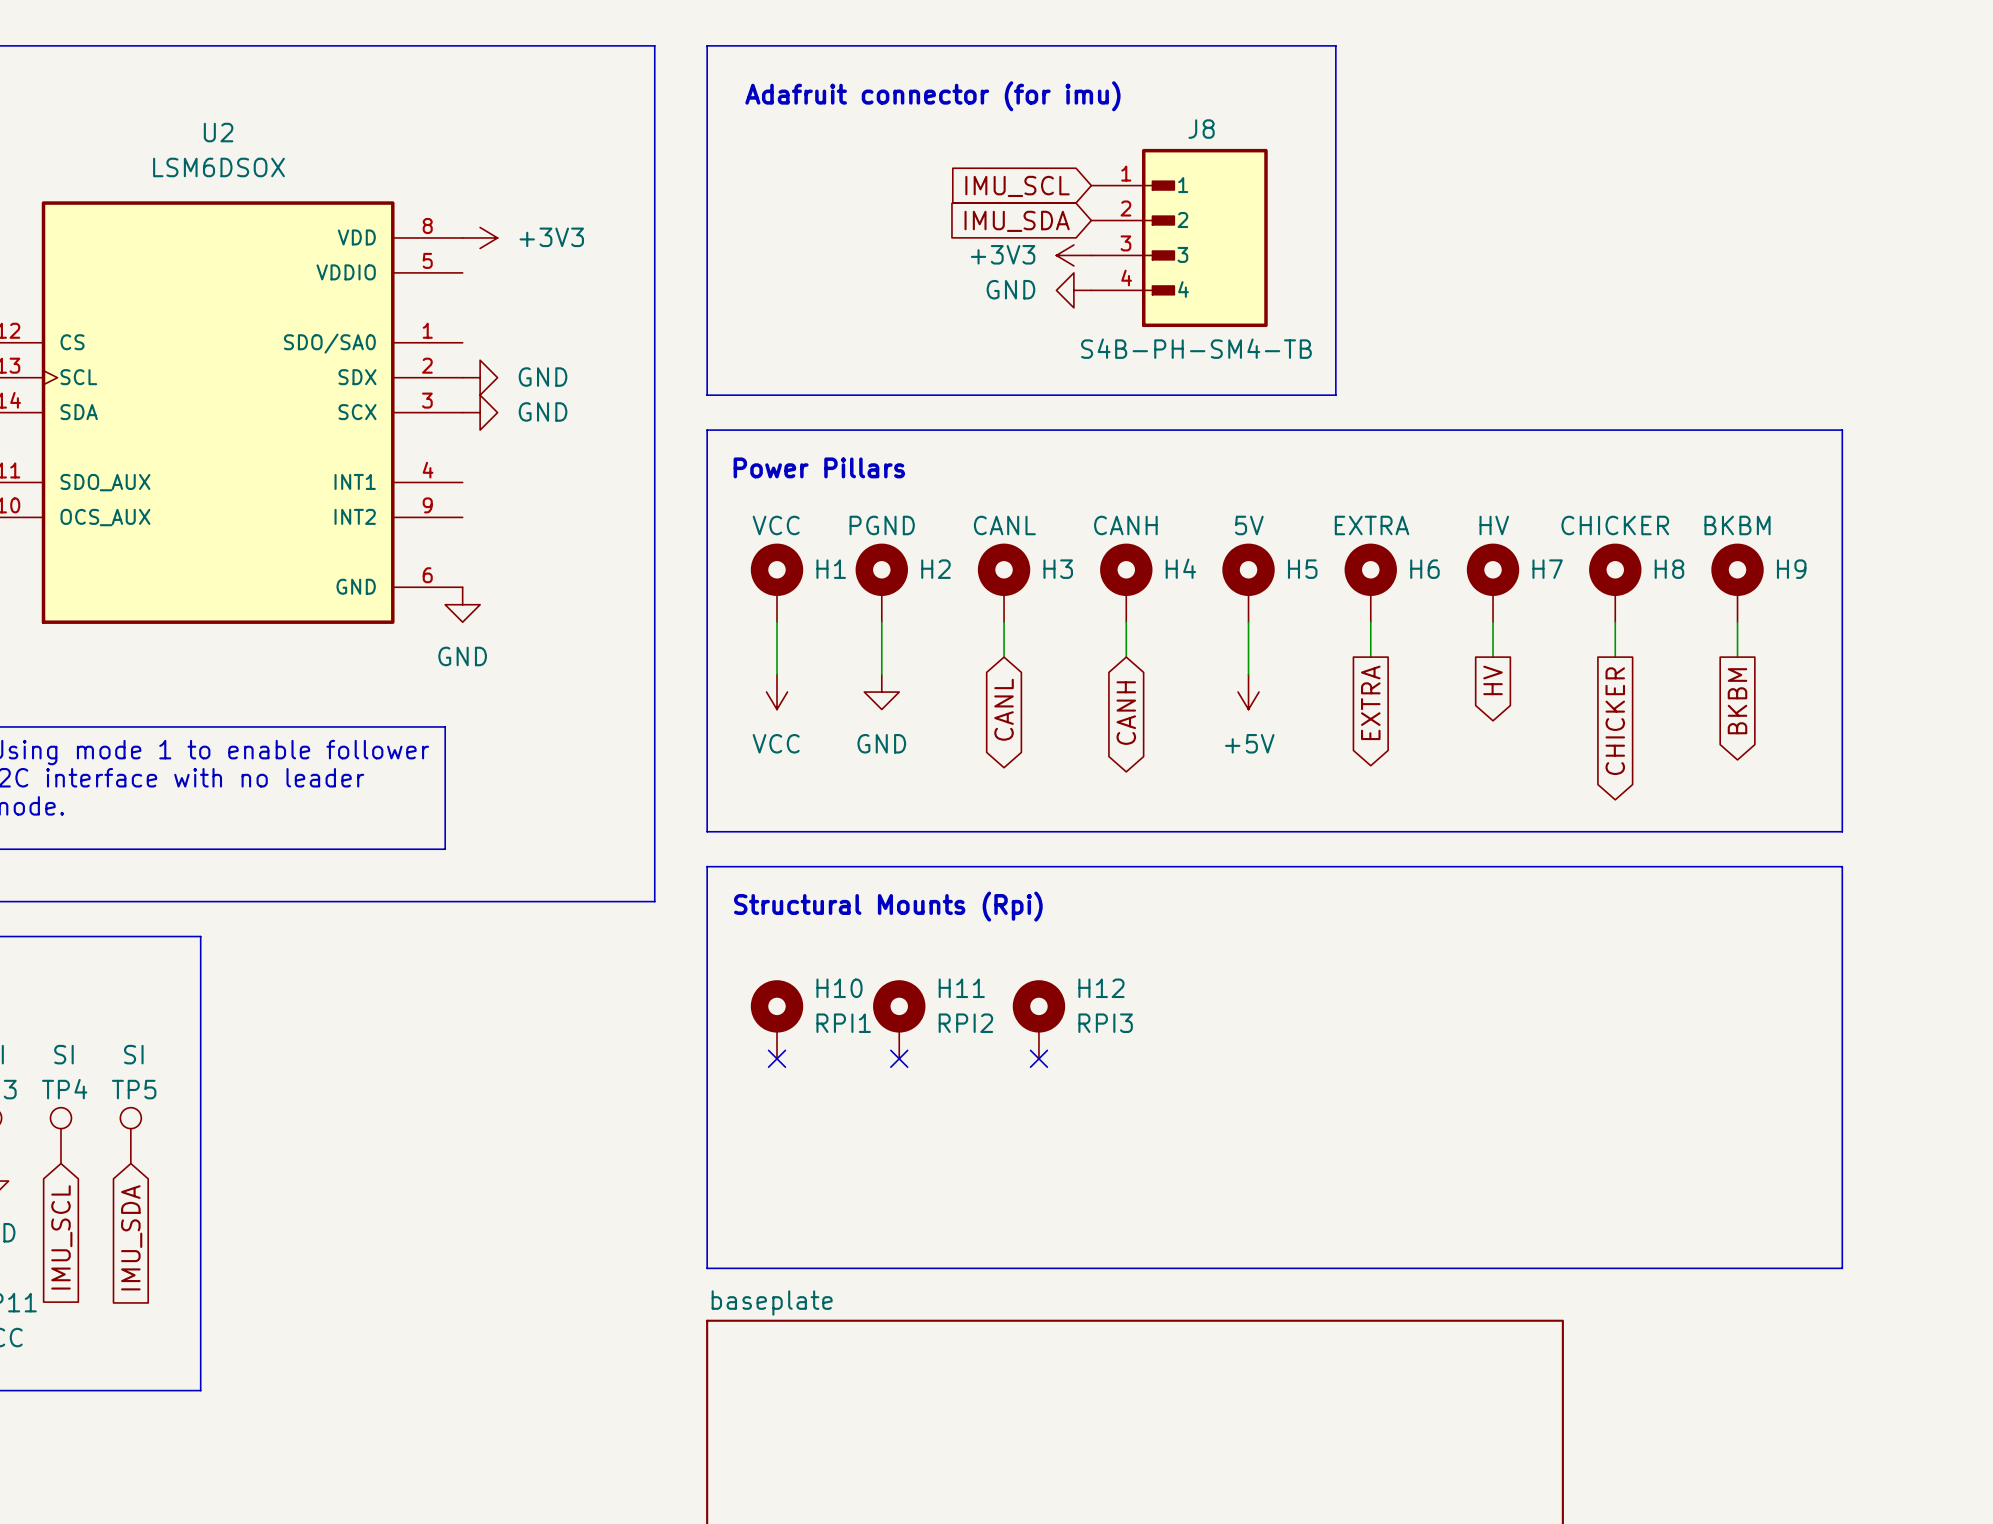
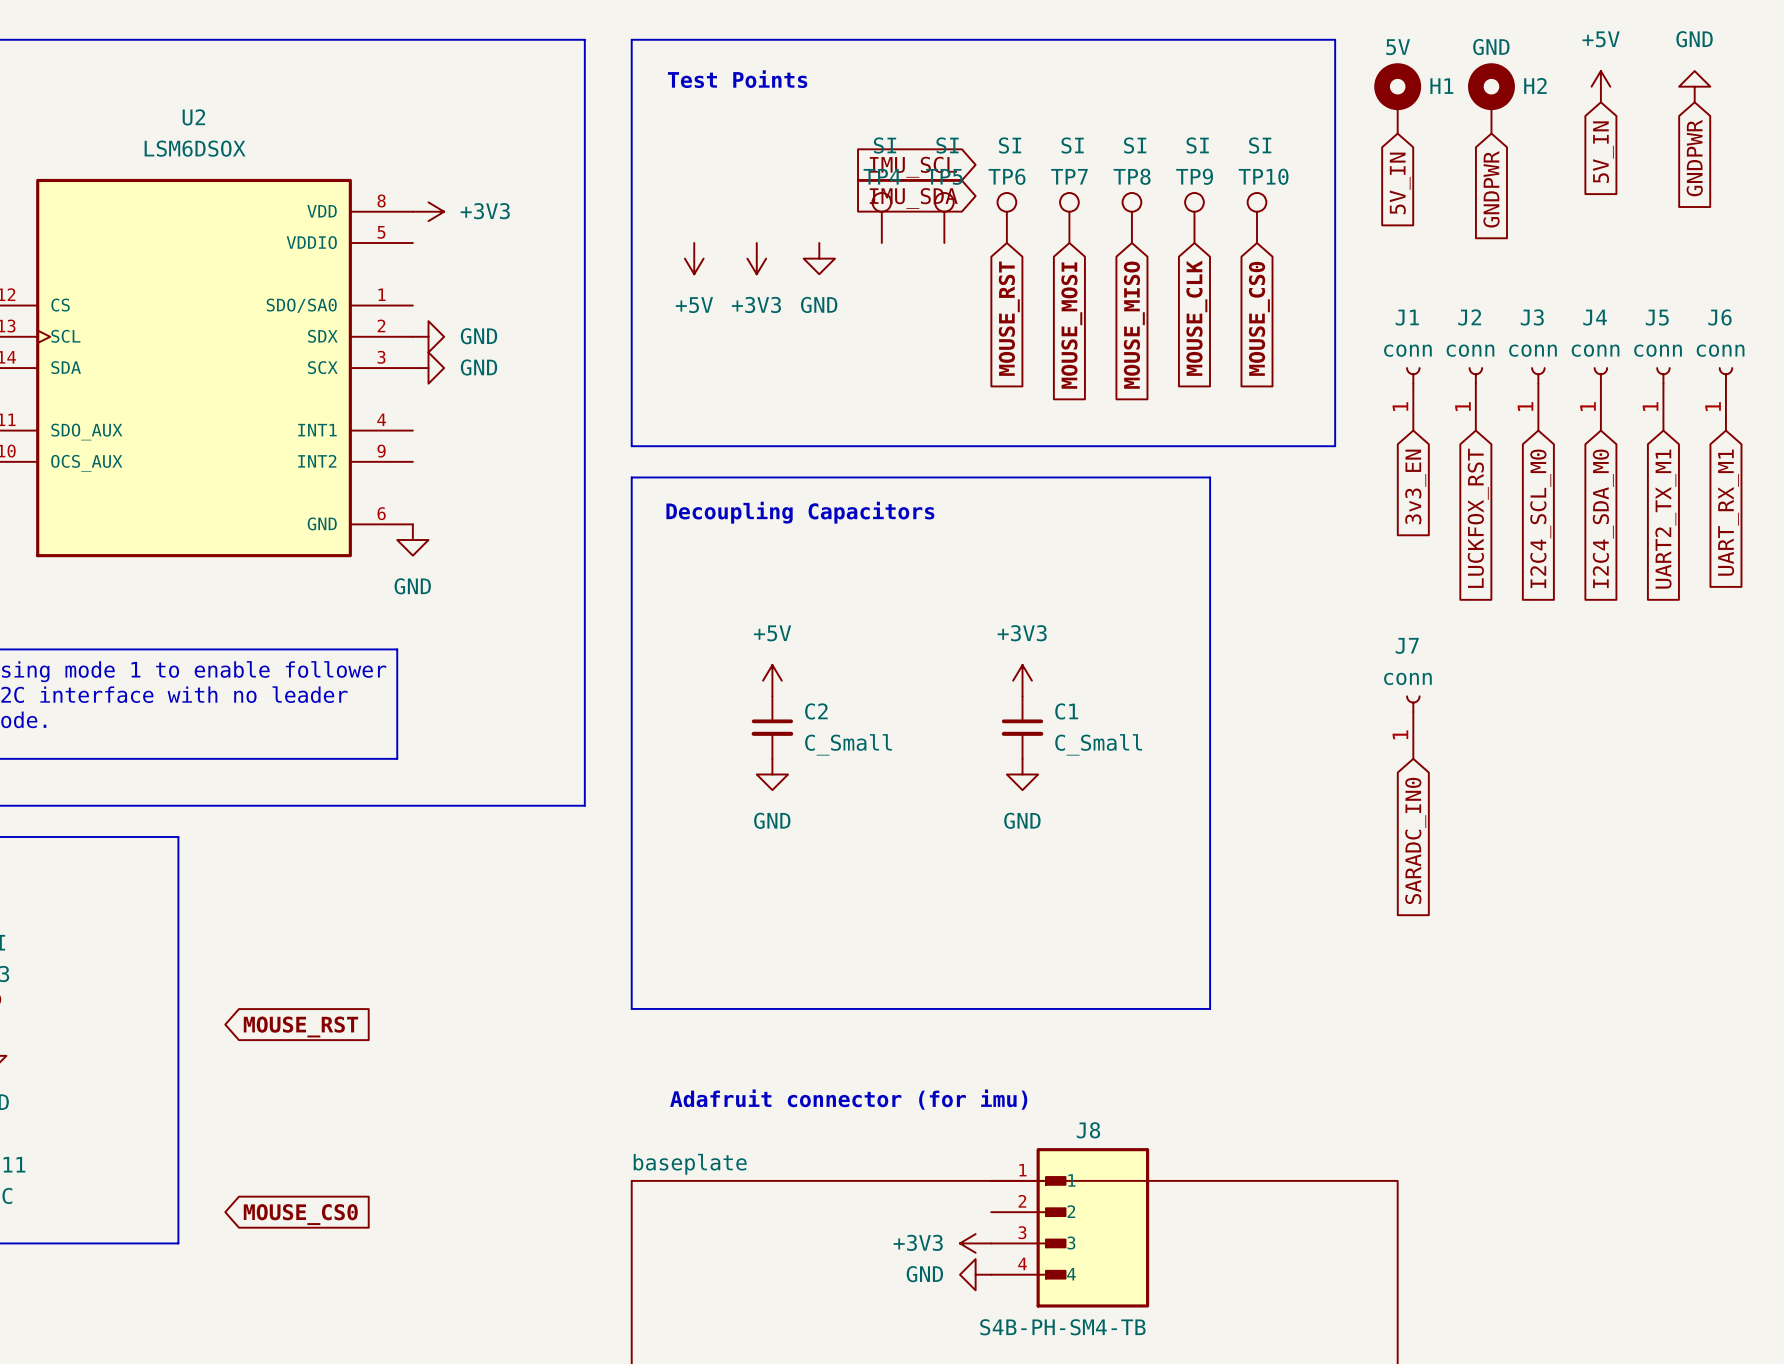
line: (1335, 45) (1335, 395) (707, 395) -> (1194, 39) (1335, 39) (1335, 446) (631, 446)
text: none -> Test Points (737, 79)
text: Adafruit connector (for imu) (932, 96) -> none
power symbol: none -> +5V (1600, 86)
power symbol: none -> GND (1694, 86)
global label: none -> 5V_IN (1603, 152)
global label: none -> GNDPWR (1694, 158)
global label: none -> 5V_IN (1400, 183)
global label: none -> GNDPWR (1491, 189)
J8 position: (1179, 237) -> (1070, 1227)
TP6: none -> SI (1006, 217)
TP7: none -> SI (1069, 217)
TP8: none -> SI (1131, 217)
TP9: none -> SI (1194, 217)
TP10: none -> SI (1257, 217)
power symbol rotation: 0° (1073, 255) -> 90° counterclockwise (756, 258)
power symbol position: +3V3 (1073, 255) -> +3V3 (756, 258)
power symbol: none -> +5V (694, 258)
power symbol rotation: 0° (1073, 290) -> 90° counterclockwise (819, 258)
power symbol position: GND (1073, 290) -> GND (819, 258)
global label: none -> MOUSE_RST (1009, 318)
global label: none -> MOUSE_CLK (1196, 318)
global label: none -> MOUSE_CS0 (1259, 318)
global label: none -> MOUSE_MOSI (1071, 325)
global label: none -> MOUSE_MISO (1134, 325)
line: (707, 430) (1842, 430) (1842, 831) (707, 831) -> (631, 383) (631, 352)
J1: none -> conn (1413, 398)
J2: none -> conn (1475, 398)
J3: none -> conn (1538, 398)
J4: none -> conn (1600, 398)
J5: none -> conn (1663, 398)
J6: none -> conn (1725, 398)
text: Power Pillars (819, 467) -> none
line: (707, 499) (707, 534) -> (631, 1008) (1210, 1008) (1210, 477) (631, 477)
H1 value: VCC (776, 525) -> 5V (1398, 47)
H2 value: PGND (882, 525) -> GND (1491, 47)
global label: none -> 3v3_EN (1415, 486)
text: none -> Decoupling Capacitors (800, 512)
H1 position: (777, 582) -> (1397, 98)
H2 position: (881, 582) -> (1491, 98)
H3: CANL (1004, 582) -> none
H4: CANH (1126, 582) -> none
H5: 5V (1248, 582) -> none
H6: EXTRA (1370, 582) -> none
H7: HV (1493, 582) -> none
H8: CHICKER (1615, 582) -> none
H9: BKBM (1737, 582) -> none
global label: none -> UART_RX_M1 (1728, 512)
global label: none -> I2C4_SCL_M0 (1540, 518)
global label: none -> I2C4_SDA_M0 (1603, 518)
global label: none -> UART2_TX_M1 (1665, 519)
global label: none -> LUCKFOX_RST (1478, 518)
wire: (777, 622) (777, 674) -> none
wire: (881, 622) (881, 674) -> none
wire: (1004, 622) (1004, 657) -> none
wire: (1126, 622) (1126, 657) -> none
wire: (1248, 622) (1248, 674) -> none
wire: (1370, 622) (1370, 657) -> none
wire: (1493, 622) (1493, 657) -> none
wire: (1615, 622) (1615, 657) -> none
global label: HV (1493, 680) -> none
power symbol: VCC (777, 692) -> none
power symbol: GND (881, 692) -> none
power symbol: +5V (1248, 692) -> none
global label: BKBM (1737, 701) -> none
global label: EXTRA (1370, 702) -> none
global label: CANL (1004, 709) -> none
global label: CANH (1126, 713) -> none
global label: CHICKER (1615, 721) -> none
power symbol: none -> +5V (772, 680)
power symbol: none -> +3V3 (1022, 680)
J7: none -> conn (1413, 727)
C2: none -> C_Small (772, 727)
C1: none -> C_Small (1022, 727)
line: (707, 866) (1842, 866) (1842, 1268) (707, 1268) (707, 1128) -> (631, 774) (631, 743)
power symbol: none -> GND (772, 774)
power symbol: none -> GND (1022, 774)
text: Structural Mounts (Rpi) (888, 906) -> none
global label: none -> SARADC_IN0 (1415, 840)
H10: RPI1 (777, 1019) -> none
H11: RPI2 (899, 1019) -> none
H12: RPI3 (1038, 1019) -> none
no-connect mark: (777, 1058) -> none
no-connect mark: (899, 1058) -> none
no-connect mark: (1038, 1058) -> none
TP4 position: (60, 1135) -> (881, 217)
TP5 position: (130, 1135) -> (944, 217)
global label: none -> MOUSE_RST (300, 1026)
text: none -> Adafruit connector (for imu) (848, 1099)
global label: IMU_SCL (61, 1237) -> none
global label: IMU_SDA (131, 1237) -> none
global label: none -> MOUSE_CS0 (300, 1214)
power symbol: none -> +3V3 (975, 1243)
power symbol: none -> GND (975, 1274)

